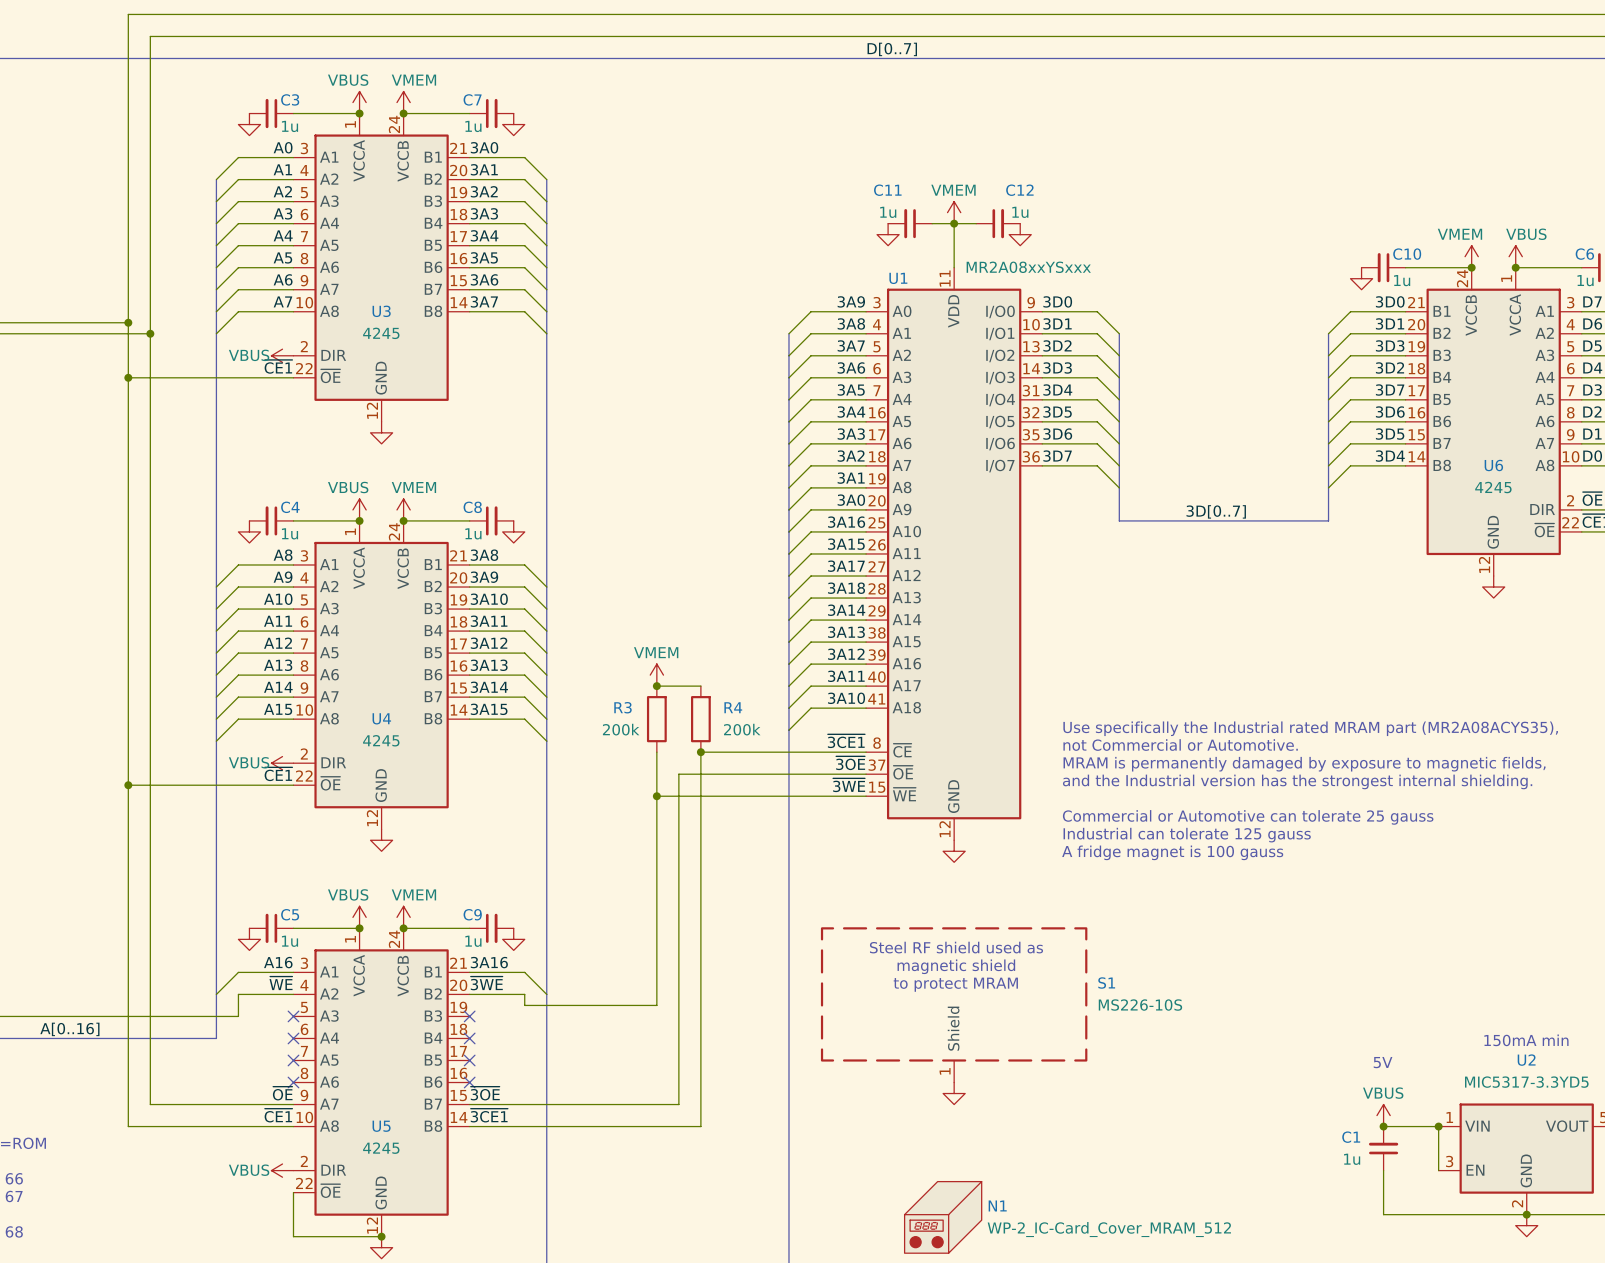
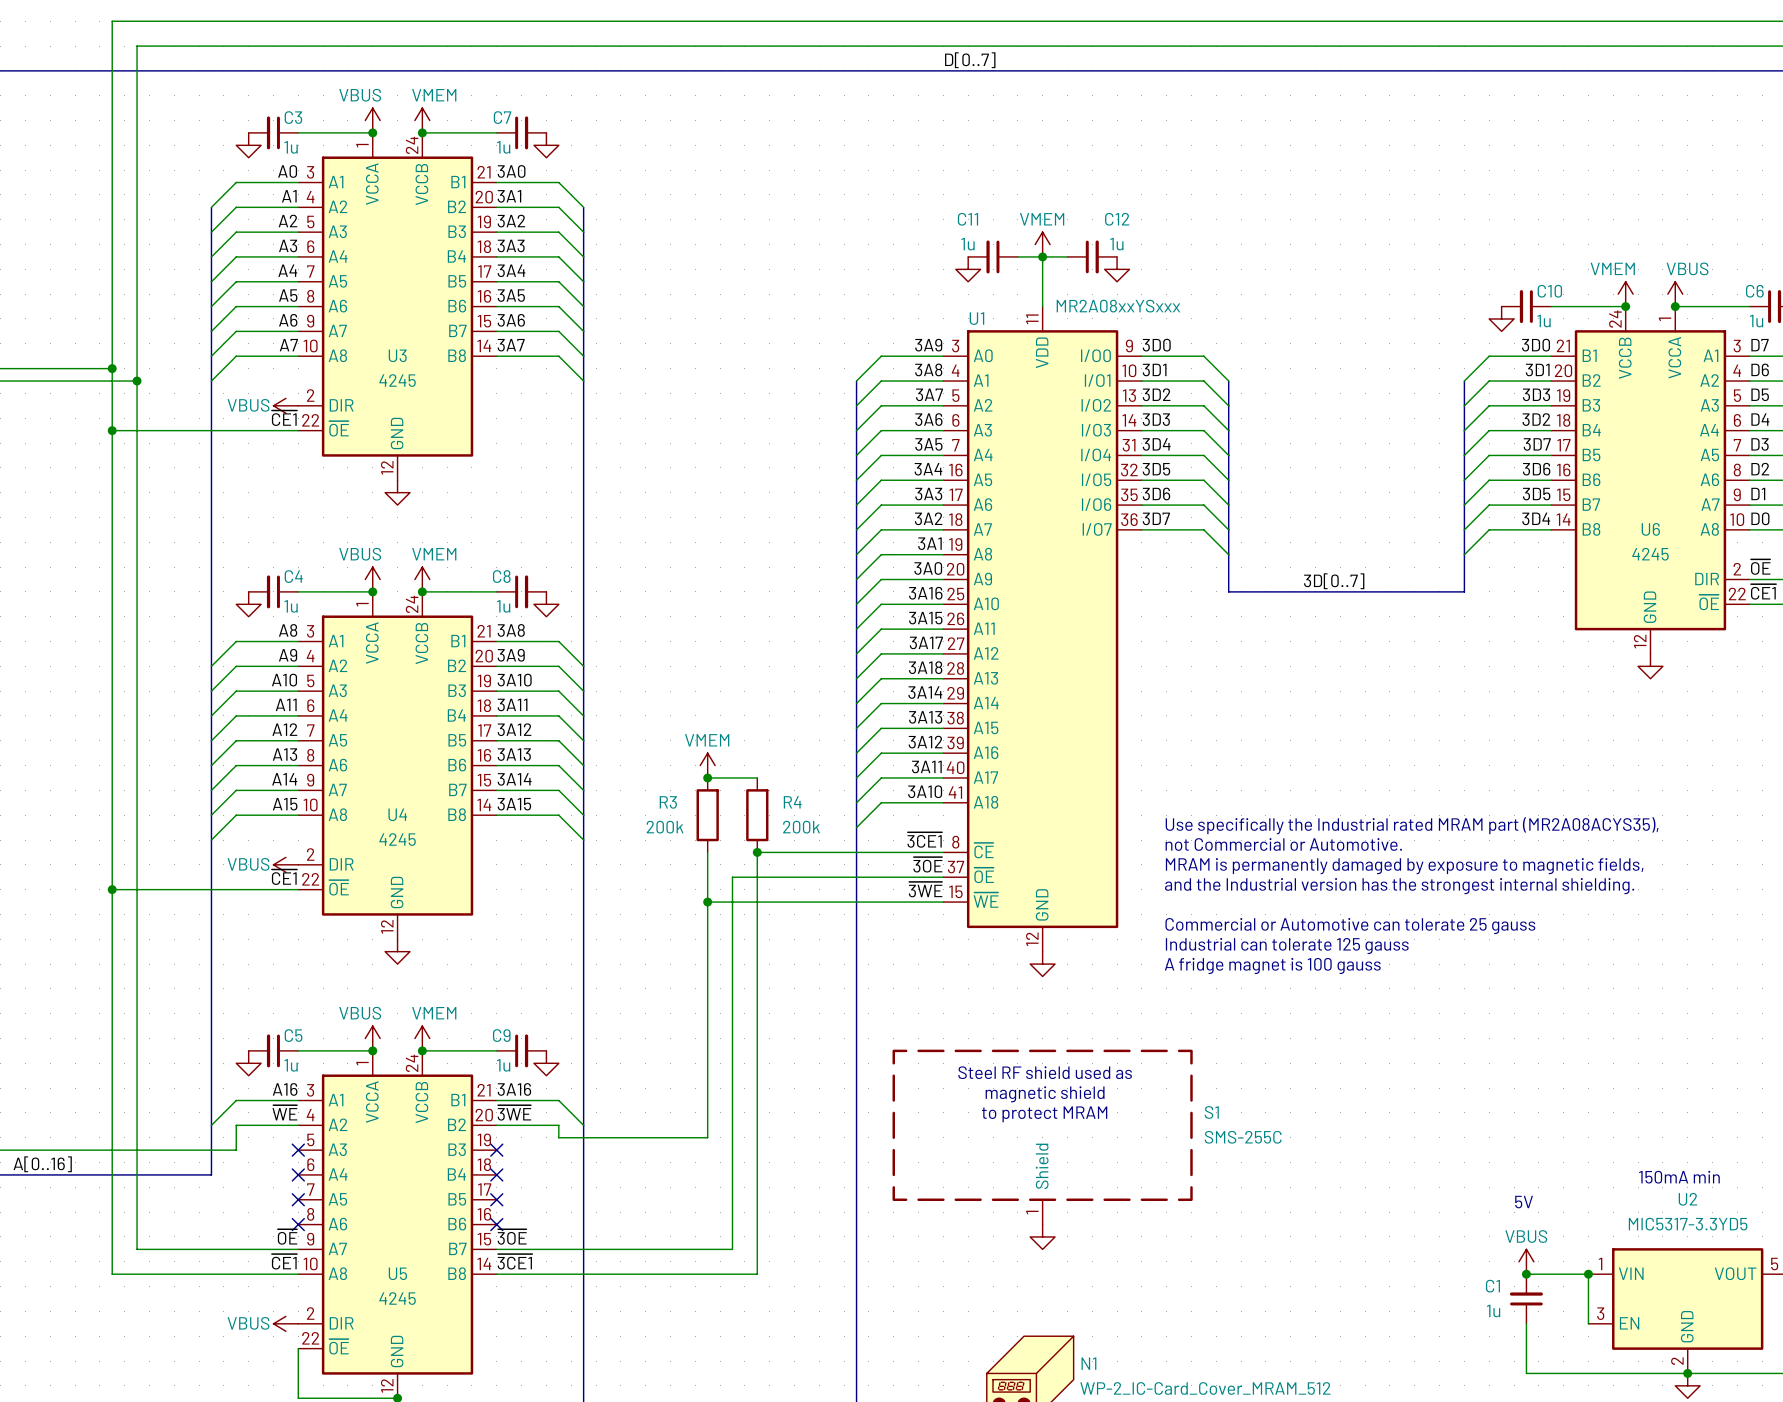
S1 value: MS226-10S (1140, 1005) -> SMS-255C (1243, 1137)

